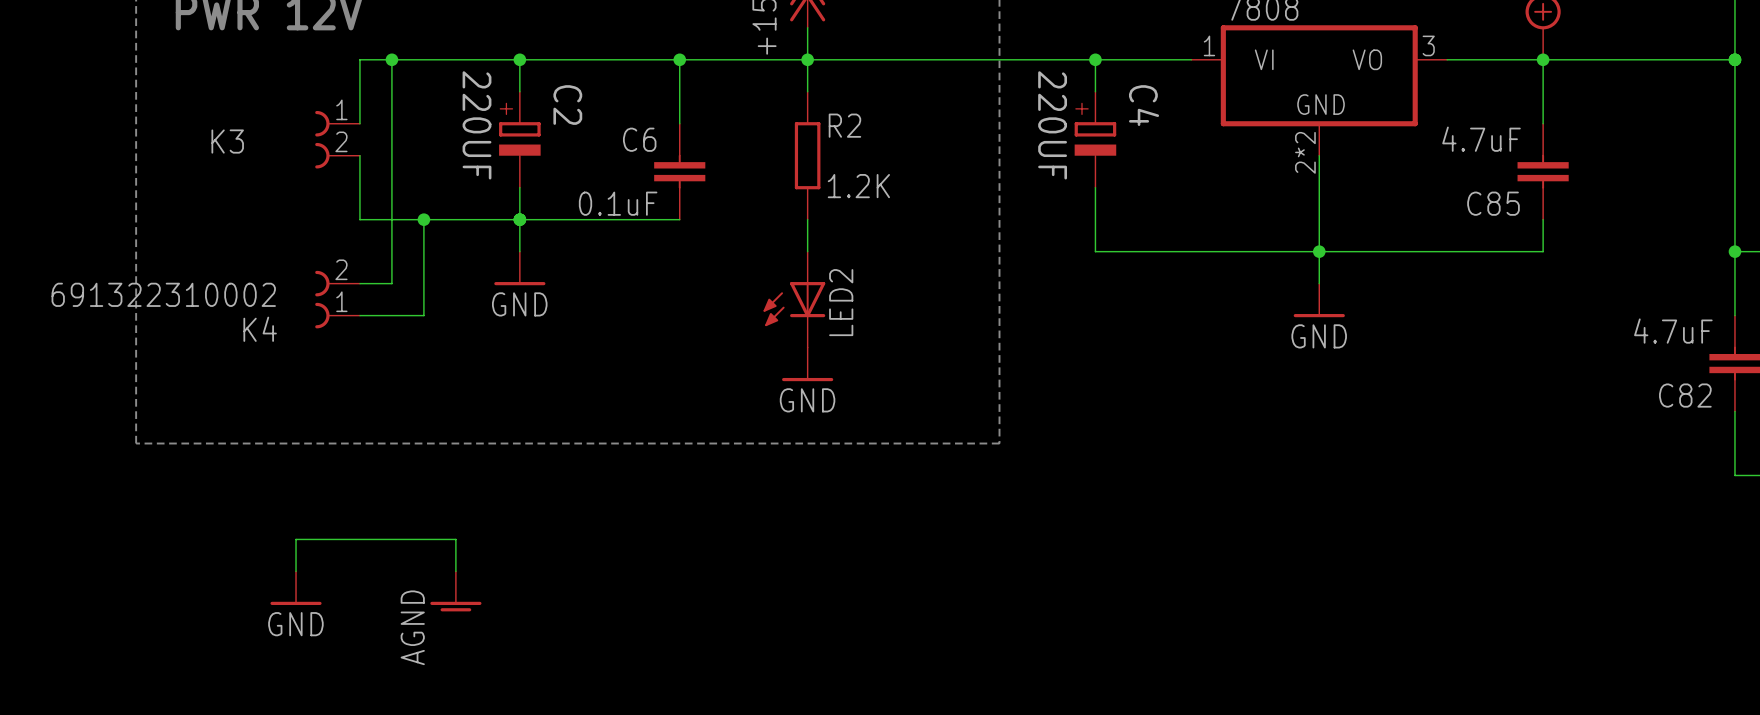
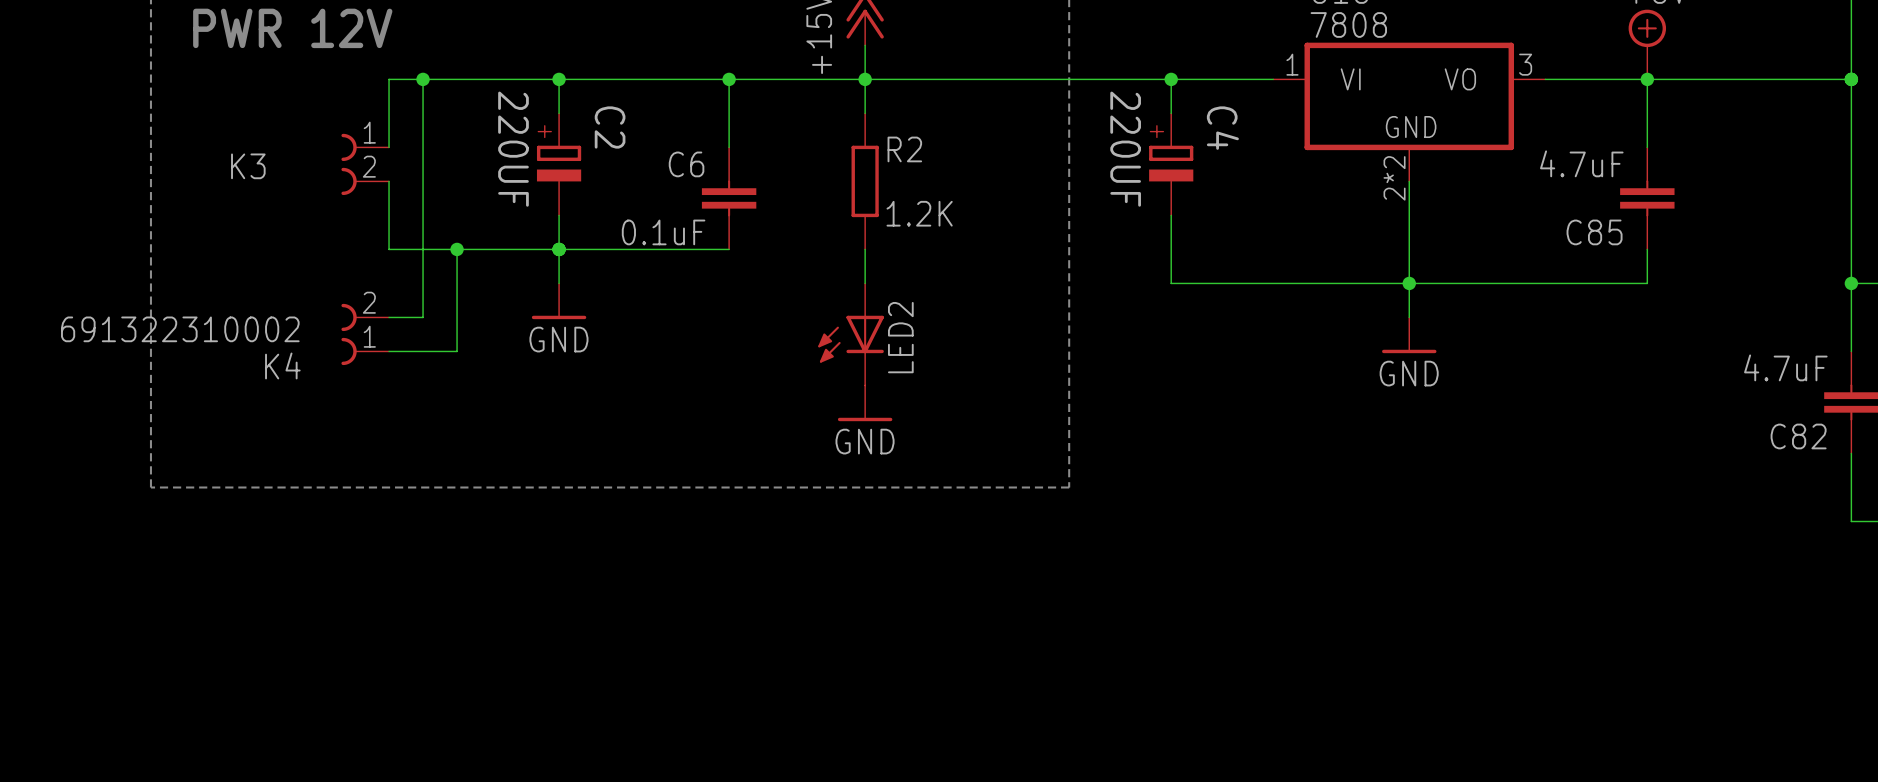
wire: (296, 571) (296, 539) (455, 539) (455, 571) -> none
power symbol: GND (296, 588) -> none
power symbol: AGND (455, 591) -> none

